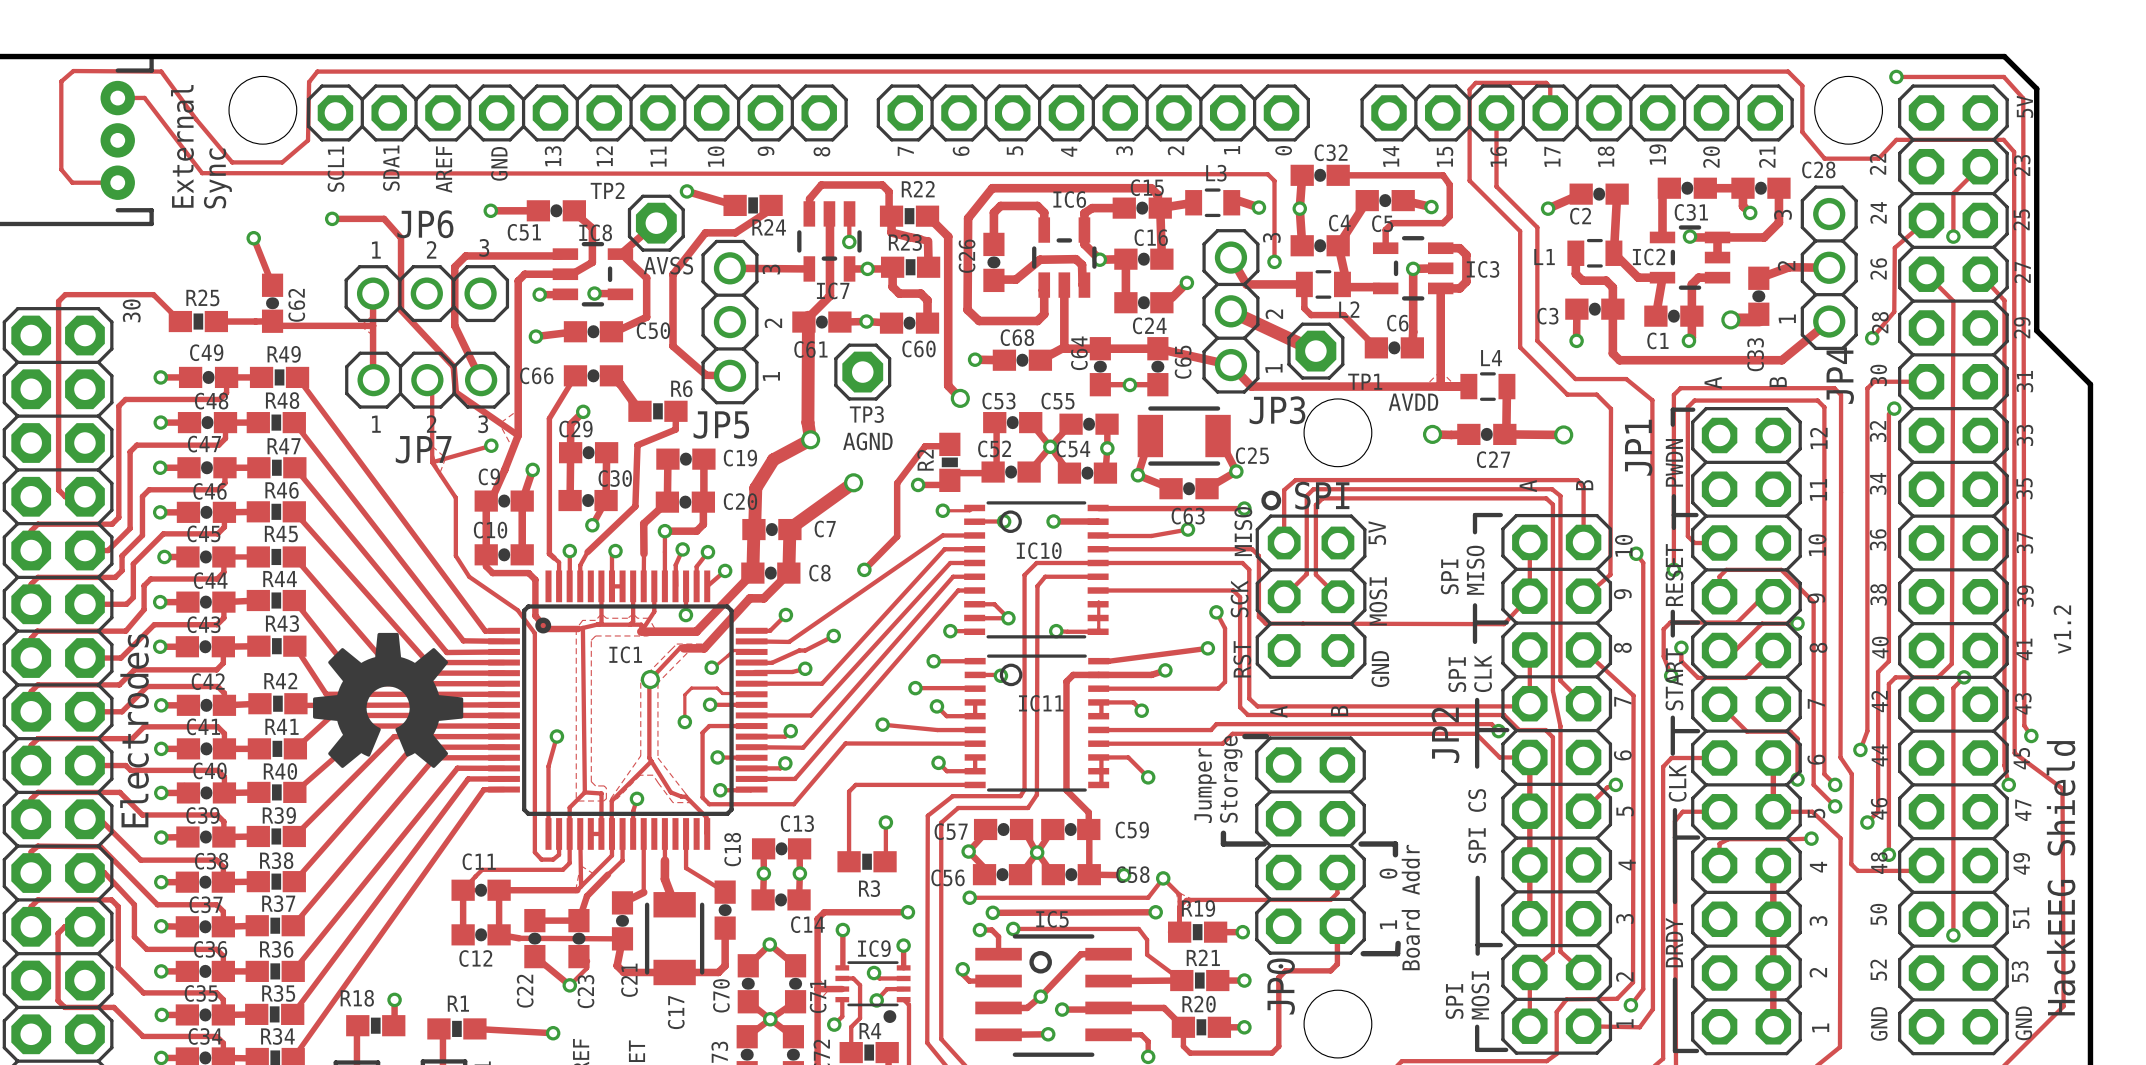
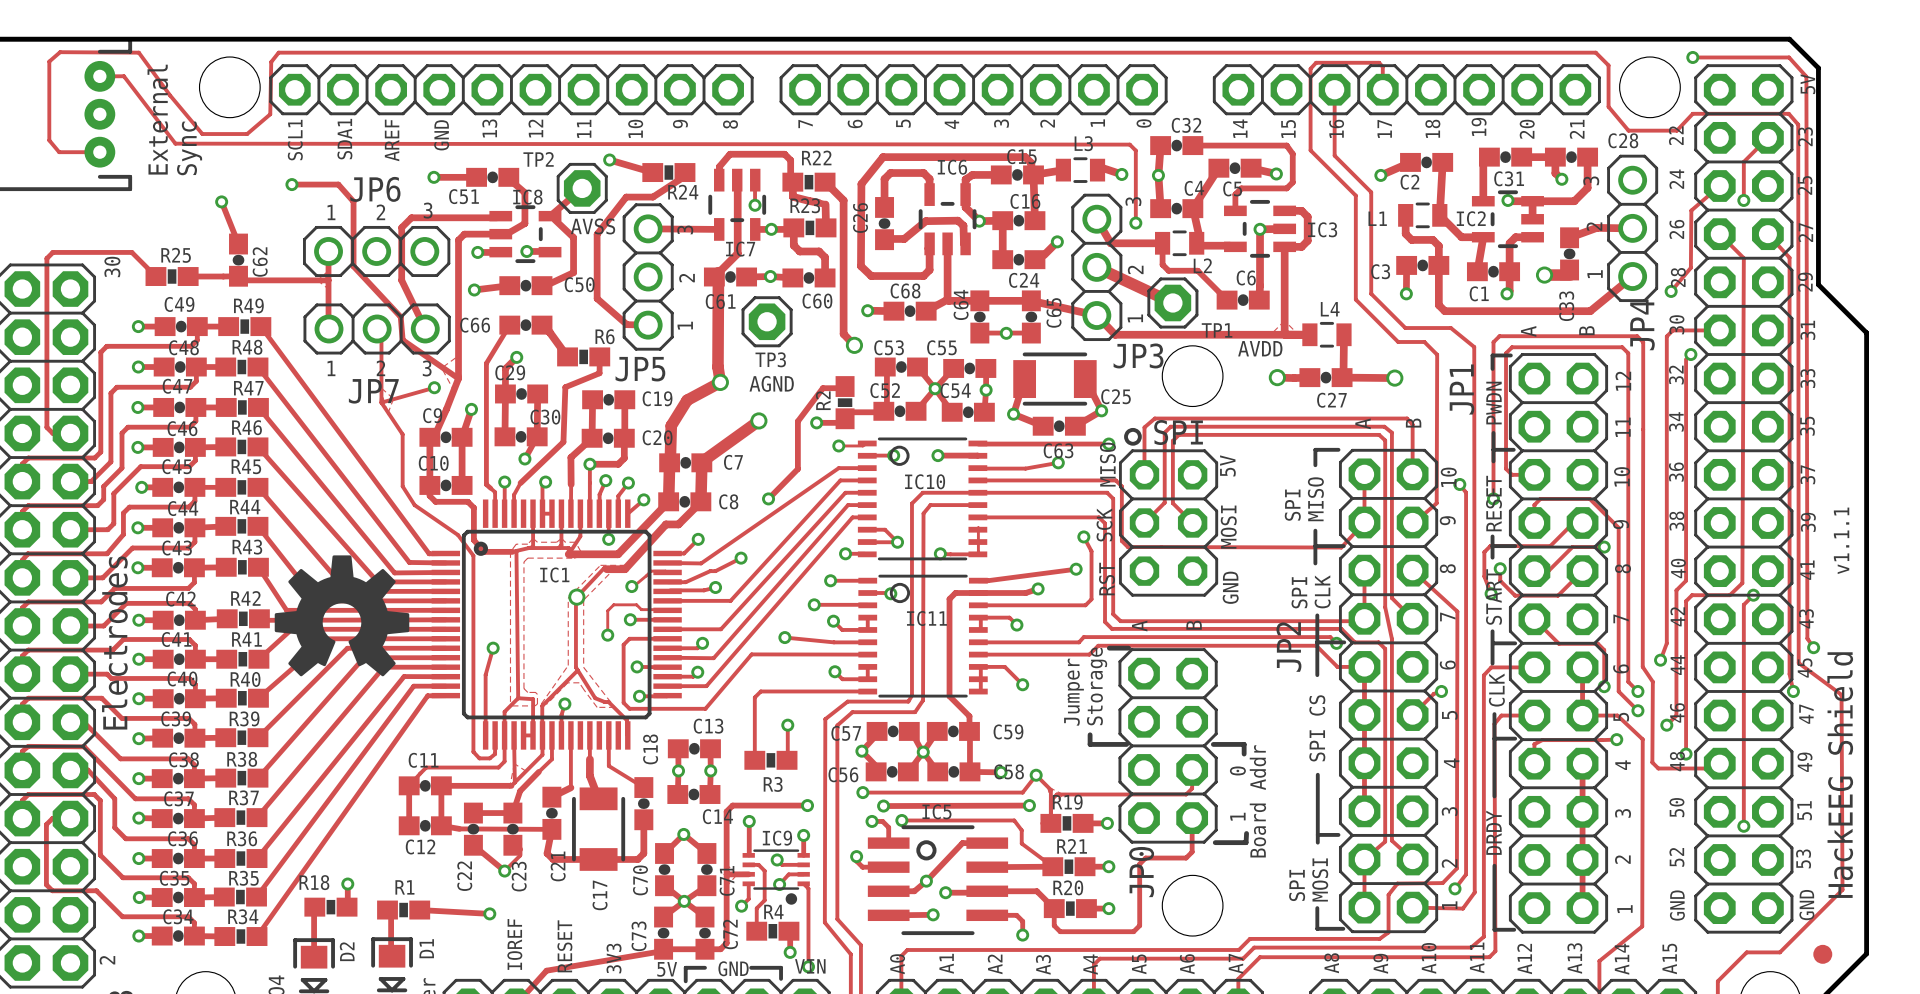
text: v1.2 (2062, 629) -> v1.1.1 (1841, 540)

